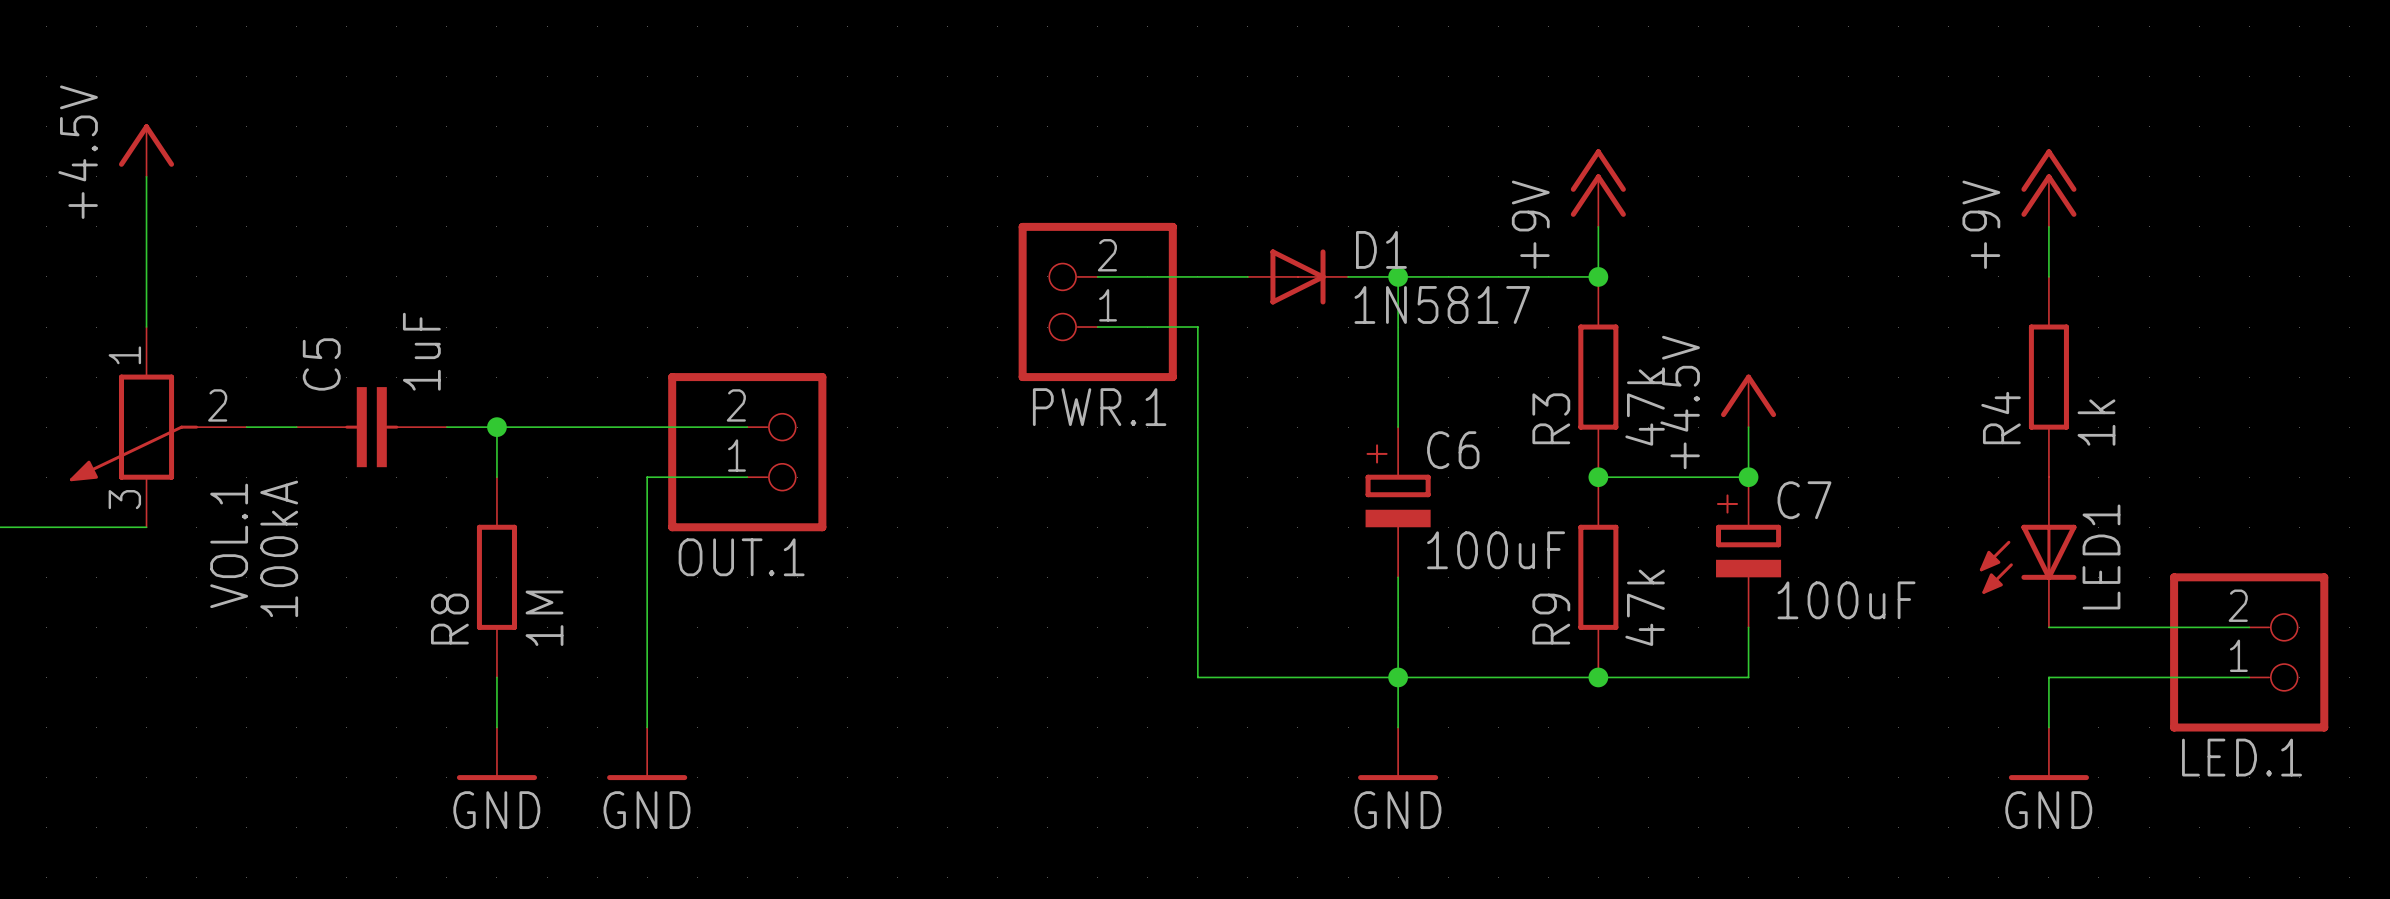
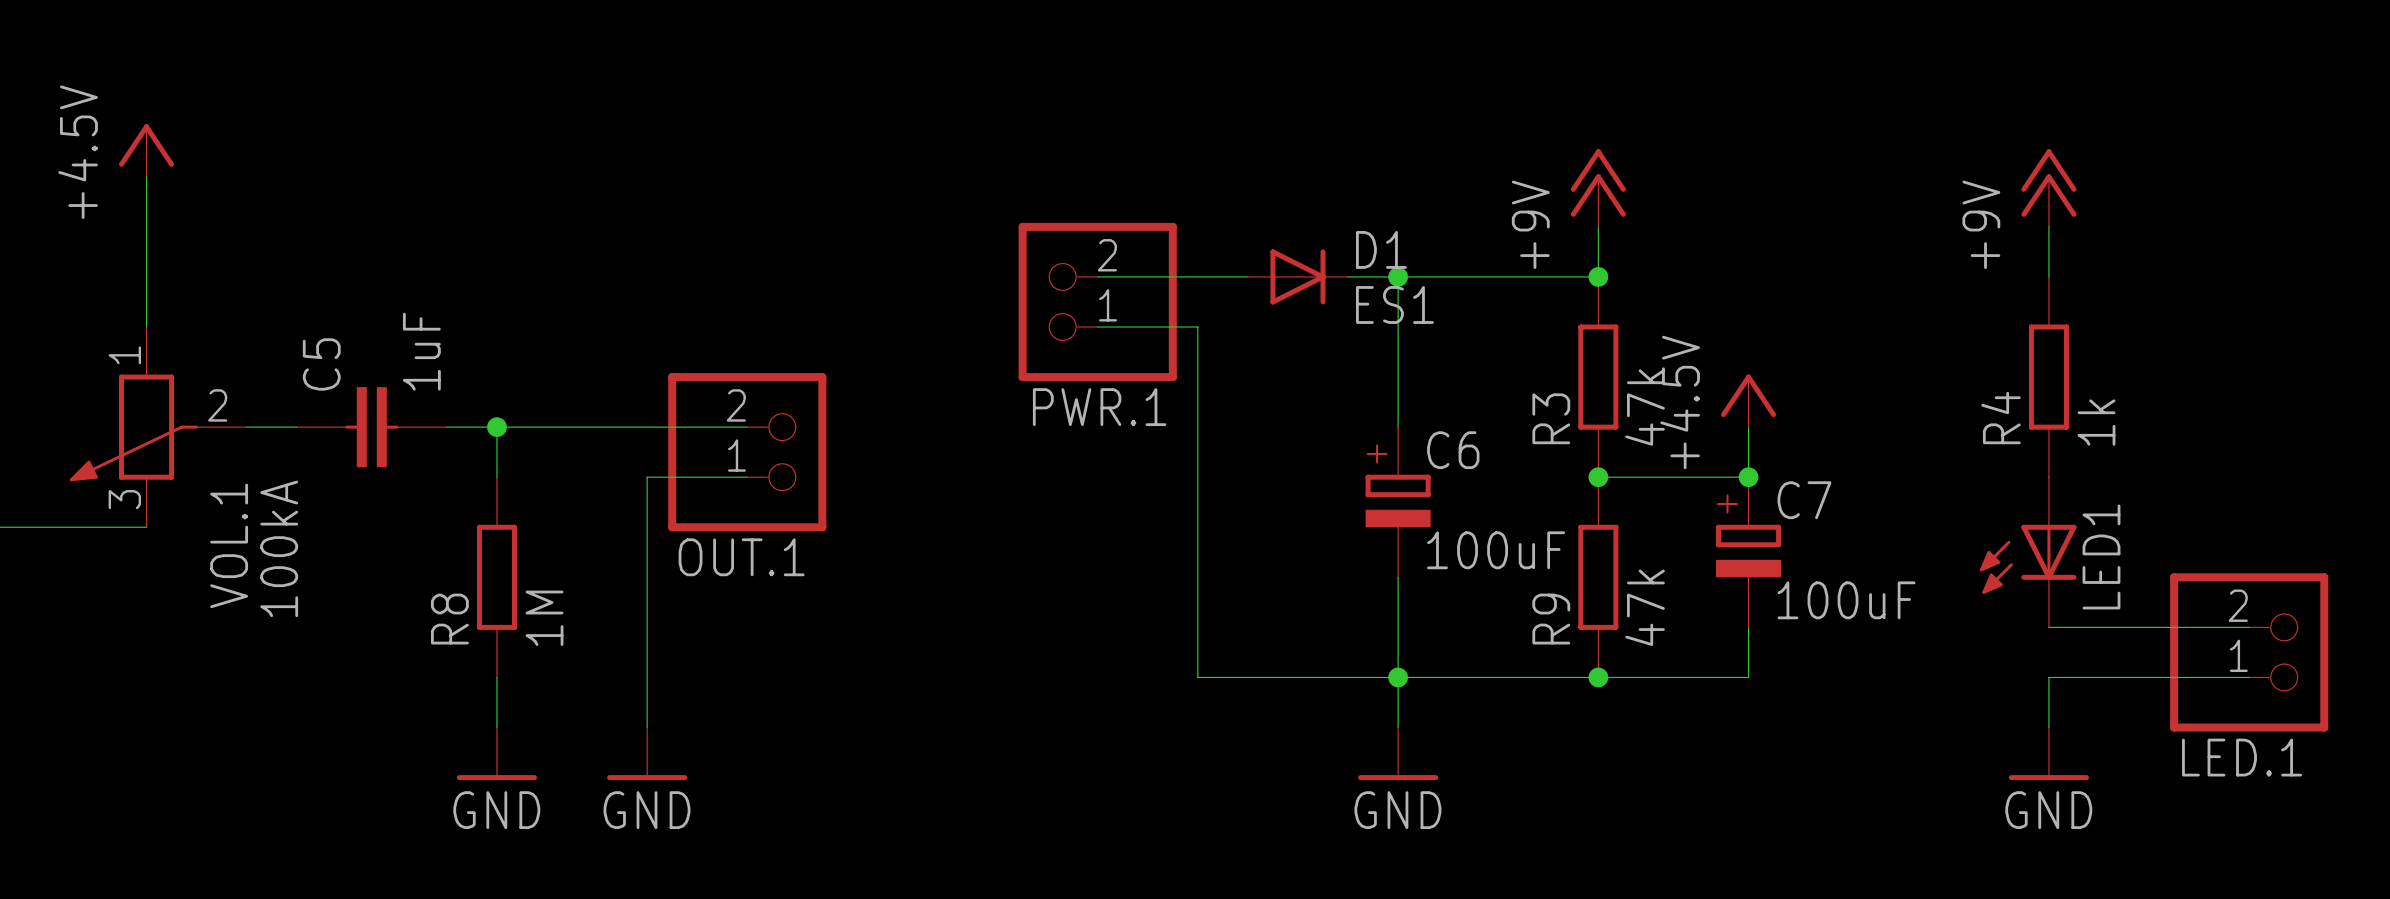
D1 value: 1N5817 (1442, 304) -> ES1 (1394, 304)

